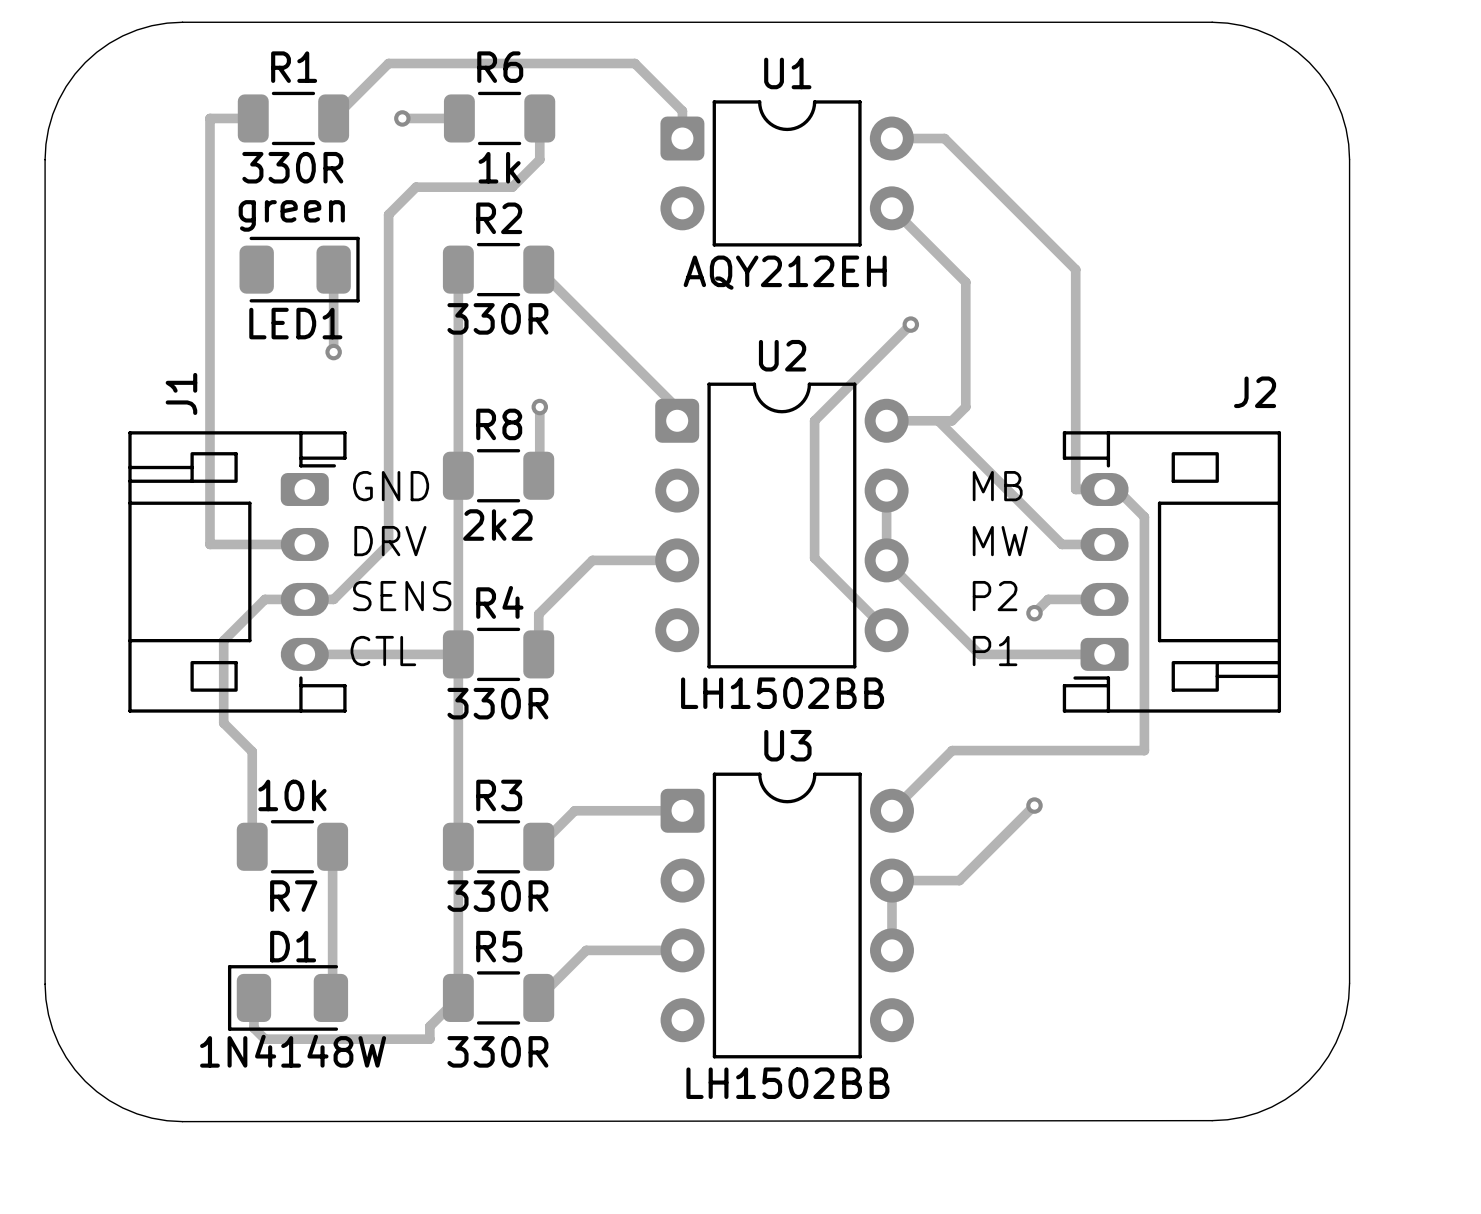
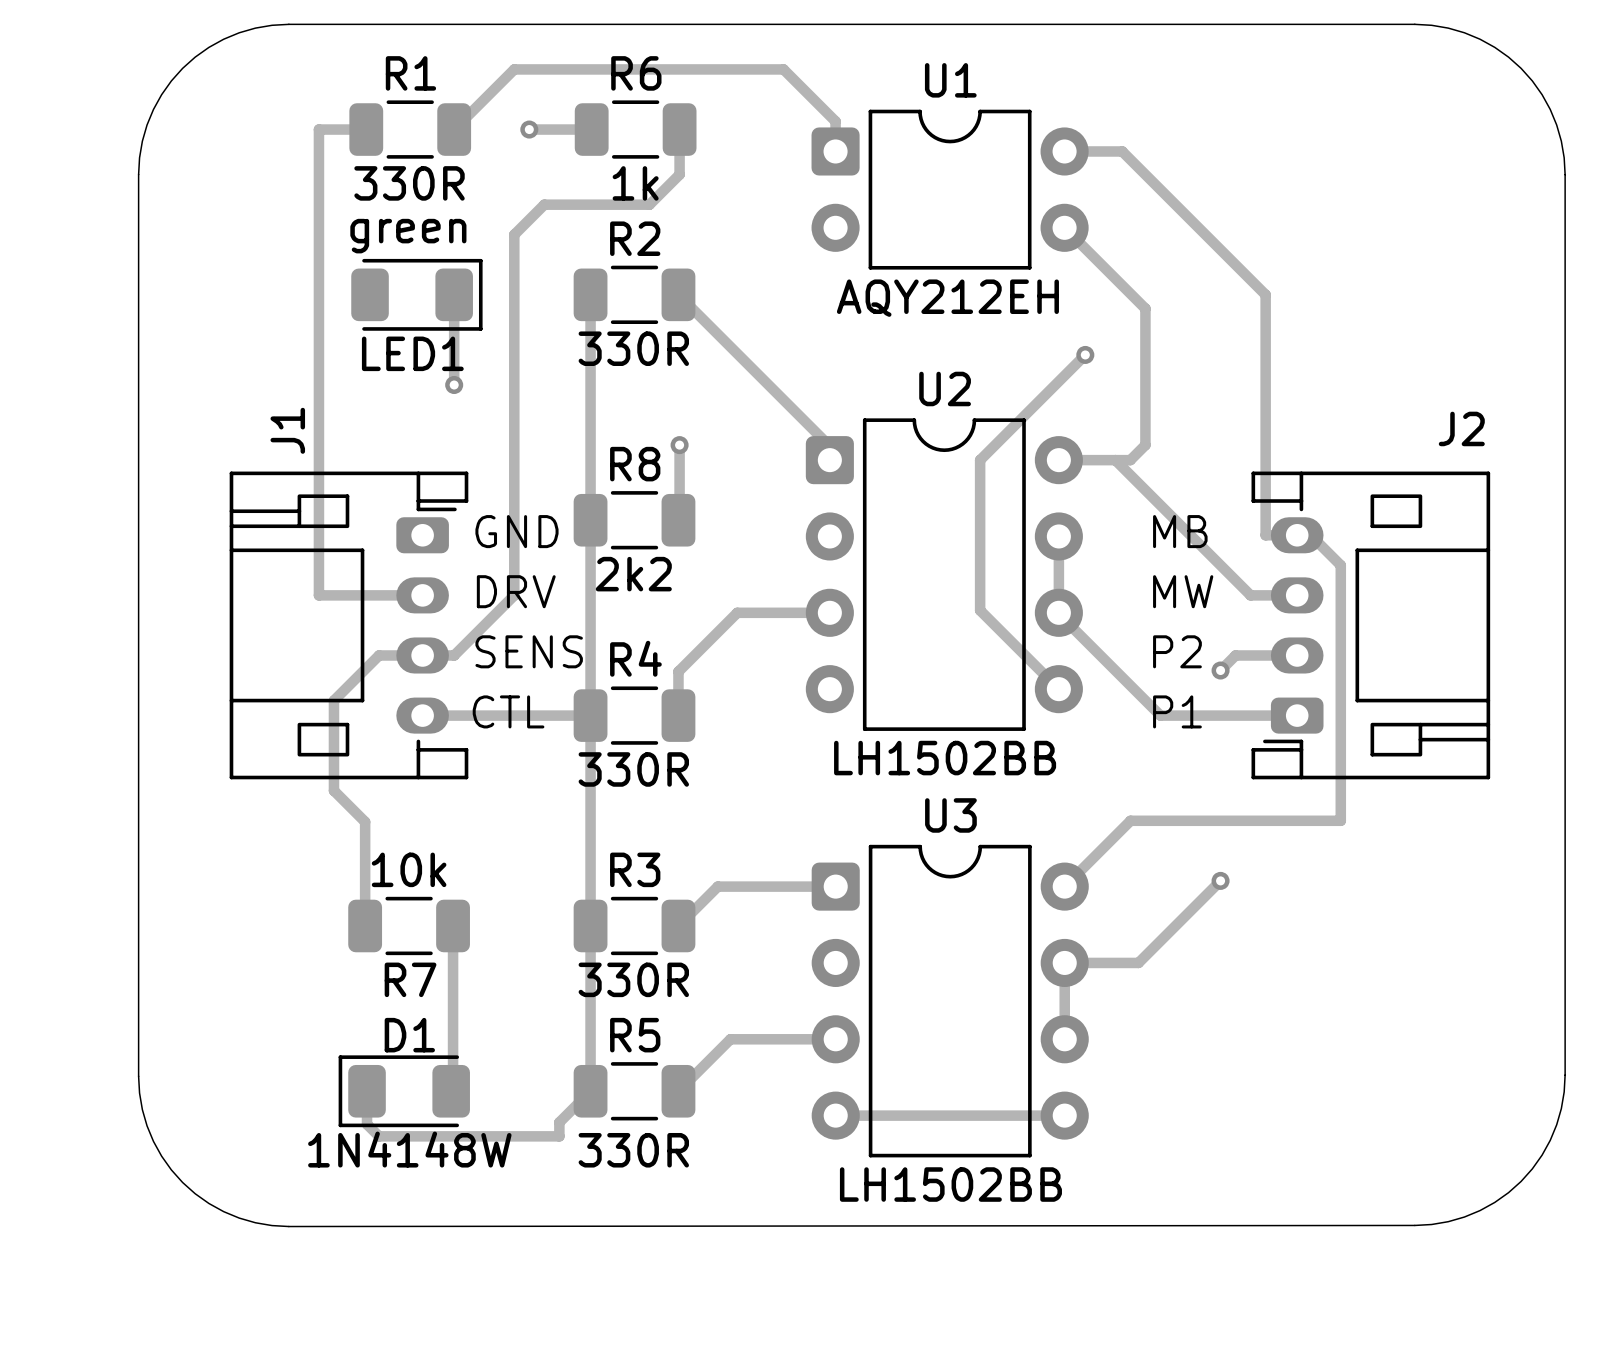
track: none -> (835, 1115) (1064, 1115)

